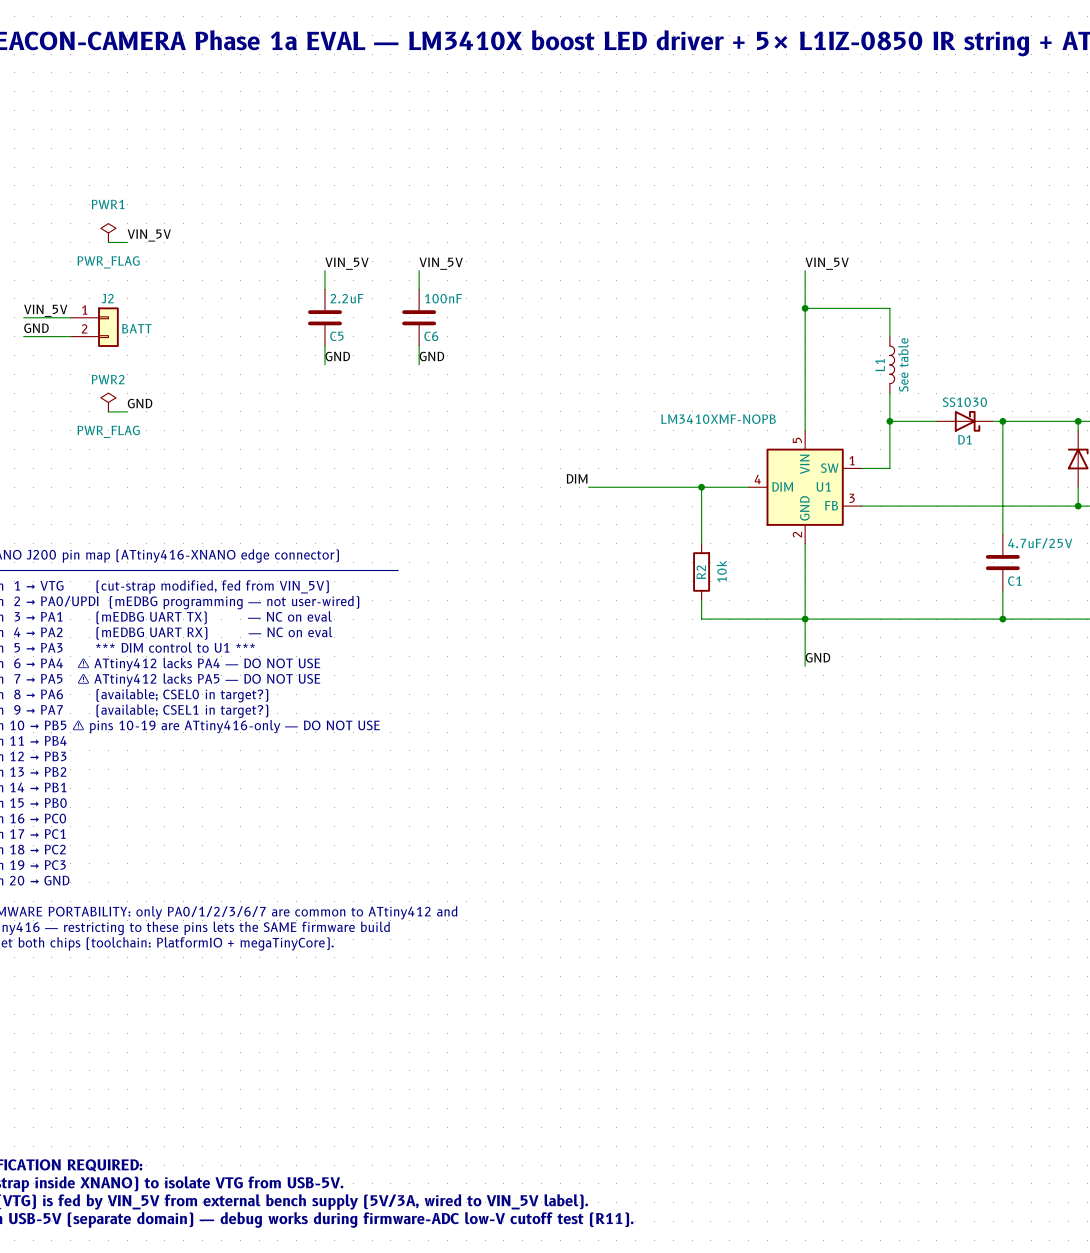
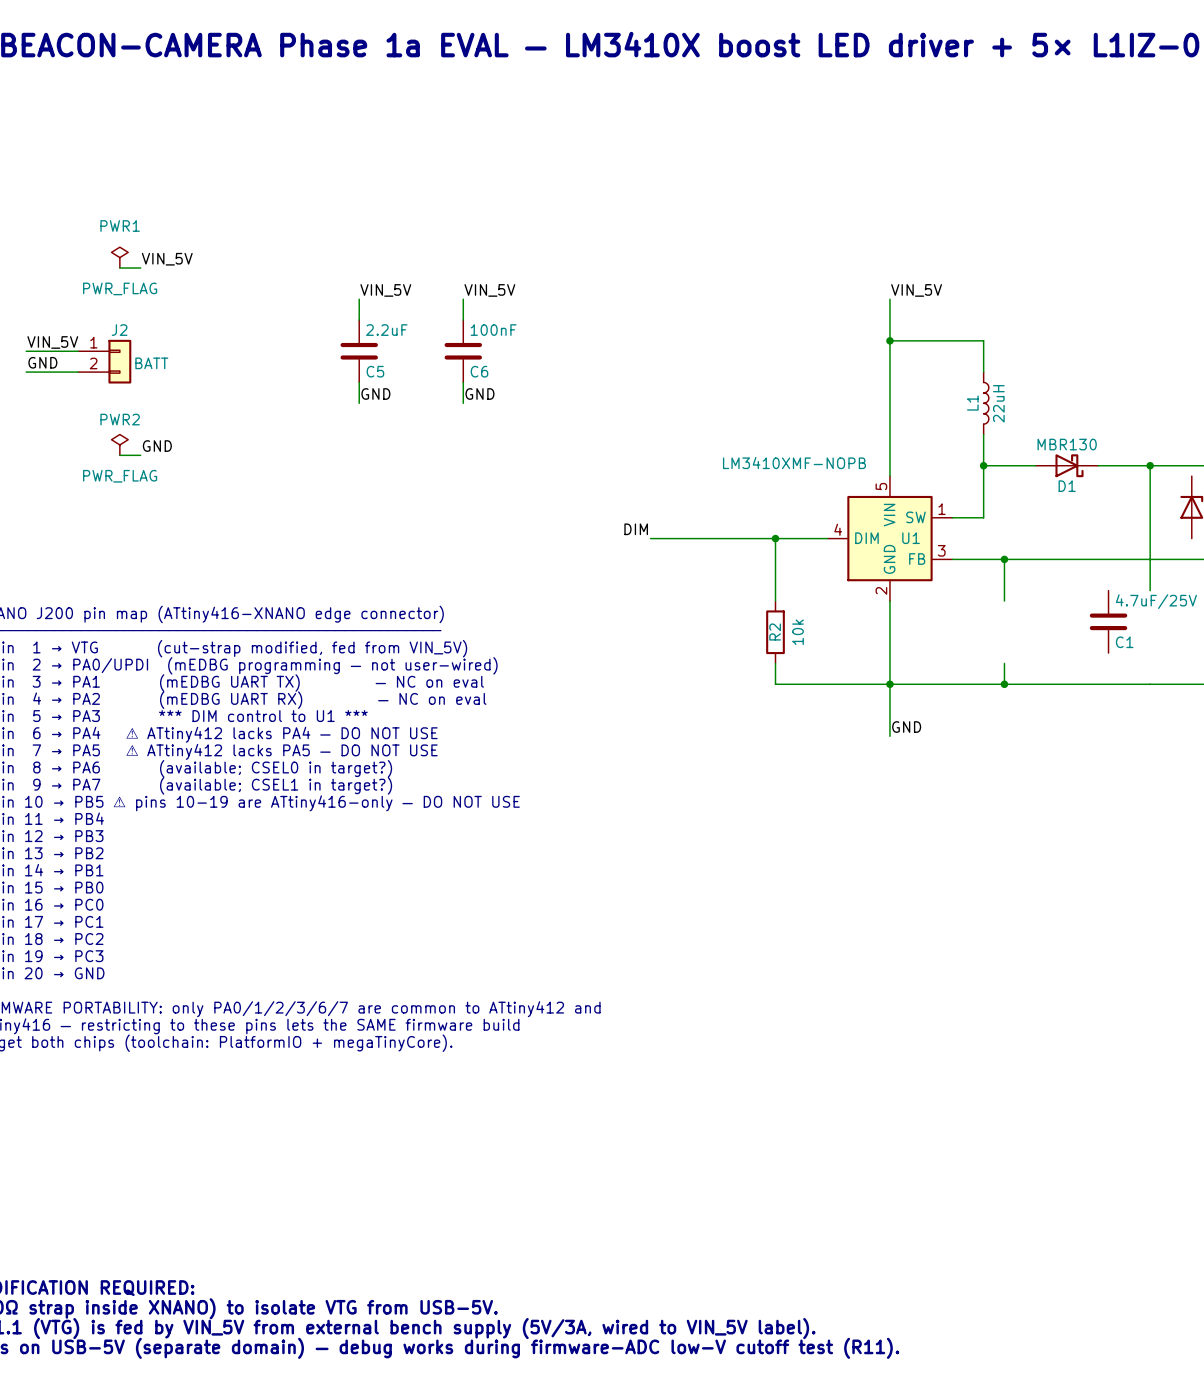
L1 value: See table (903, 364) -> 22uH (998, 403)
D1 value: SS1030 (964, 402) -> MBR130 (1067, 444)
wire: (1002, 421) (1002, 534) -> (1150, 465) (1150, 590)
junction: (1002, 421) -> none
junction: none -> (1150, 465)
wire: (1078, 421) (1078, 430) -> none
junction: (1078, 421) -> none
wire: (1078, 487) (1078, 506) -> none
wire: none -> (1004, 559) (1004, 601)
junction: none -> (1004, 559)
junction: (1078, 506) -> none
wire: (1002, 590) (1002, 619) -> none
wire: none -> (1004, 663) (1004, 684)
junction: none -> (1004, 684)
junction: (1002, 619) -> none

